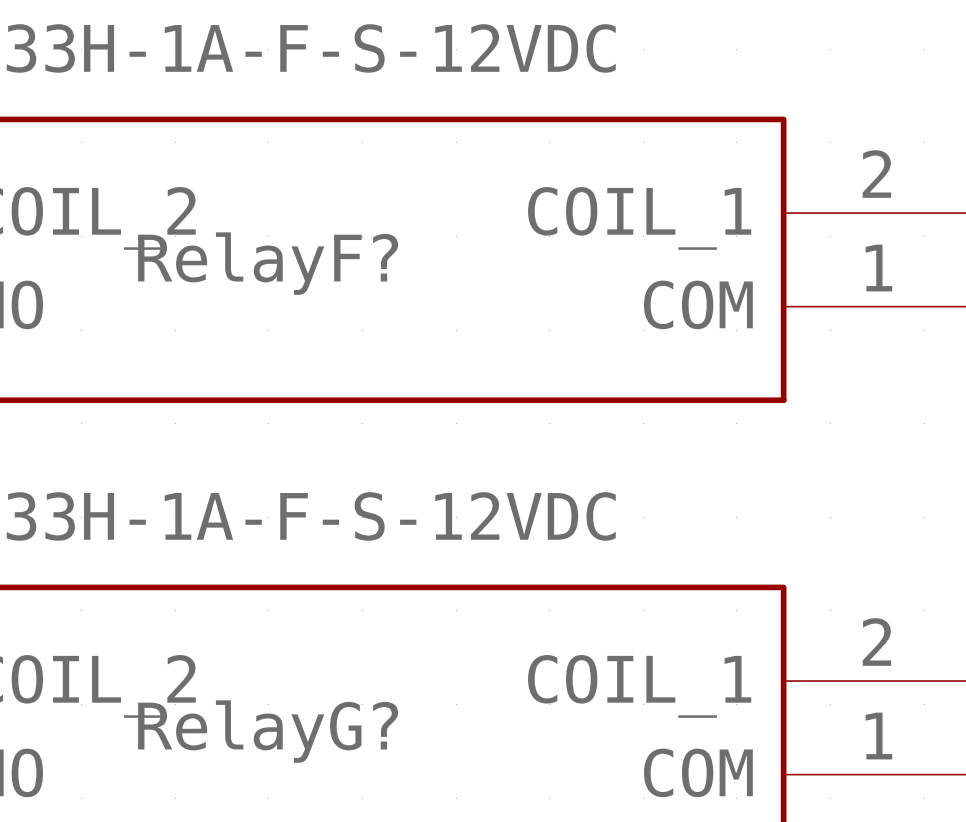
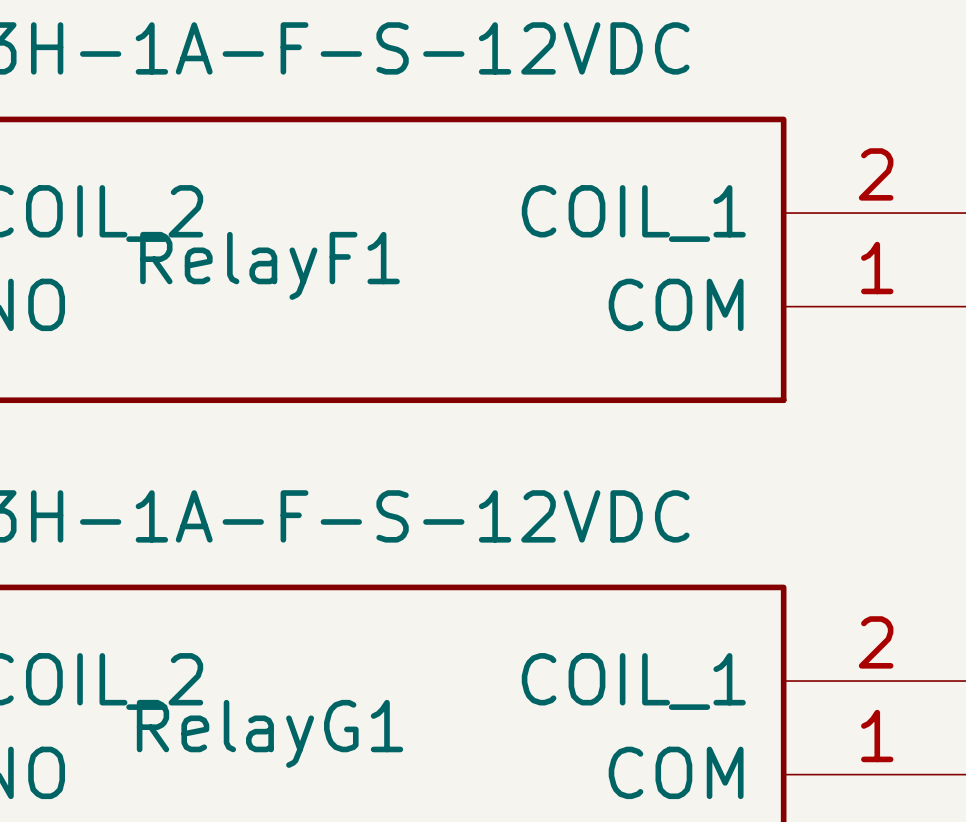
RelayF? name: RelayF? (268, 263) -> RelayF1 (269, 265)
RelayG? name: RelayG? (268, 731) -> RelayG1 (269, 733)

